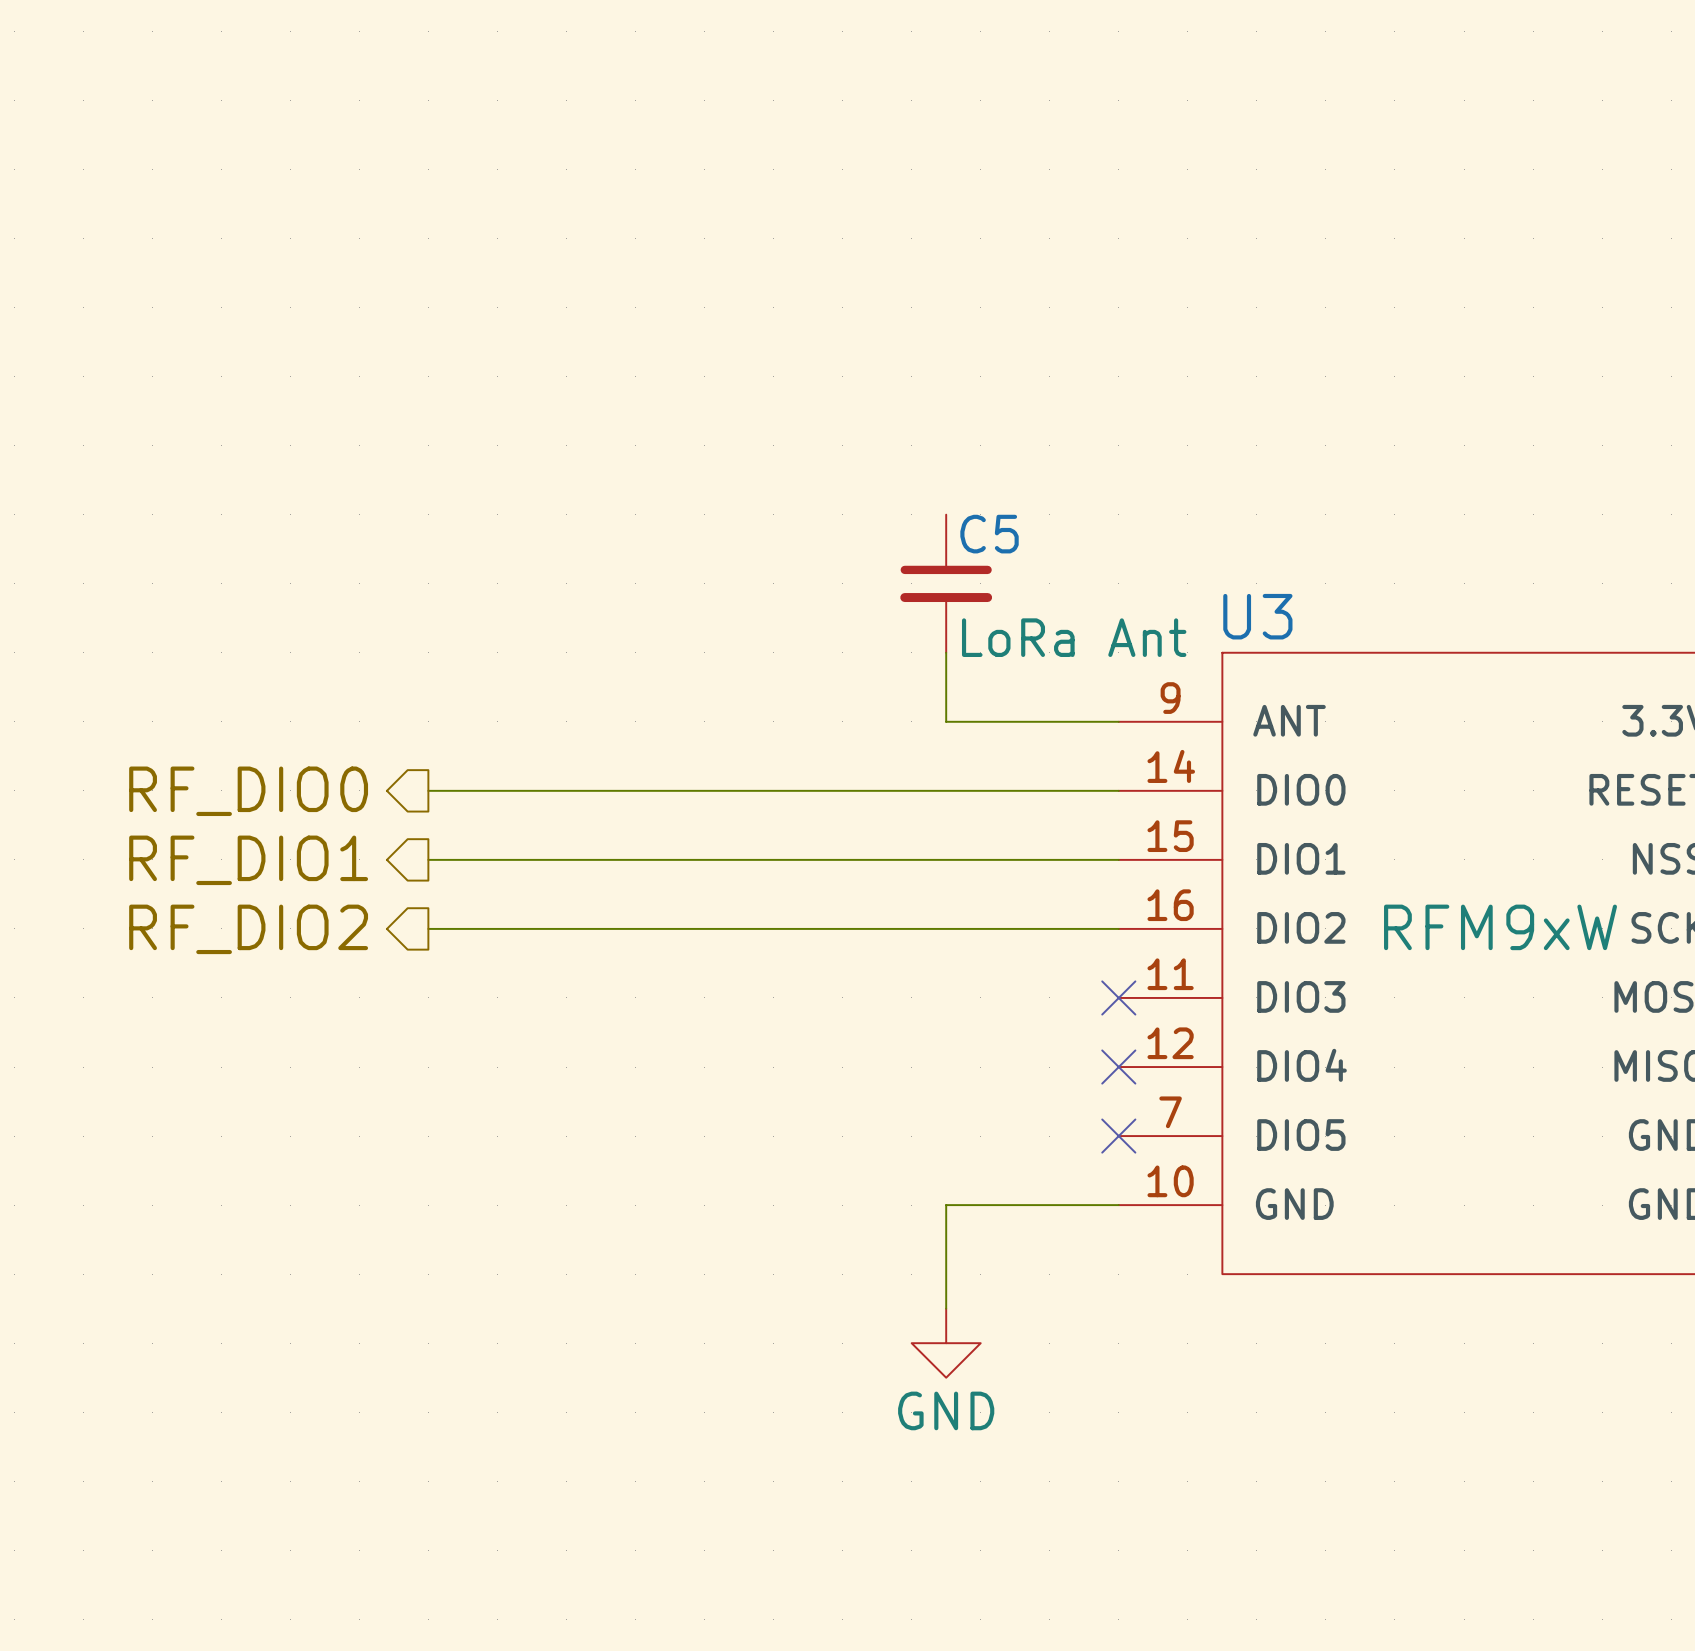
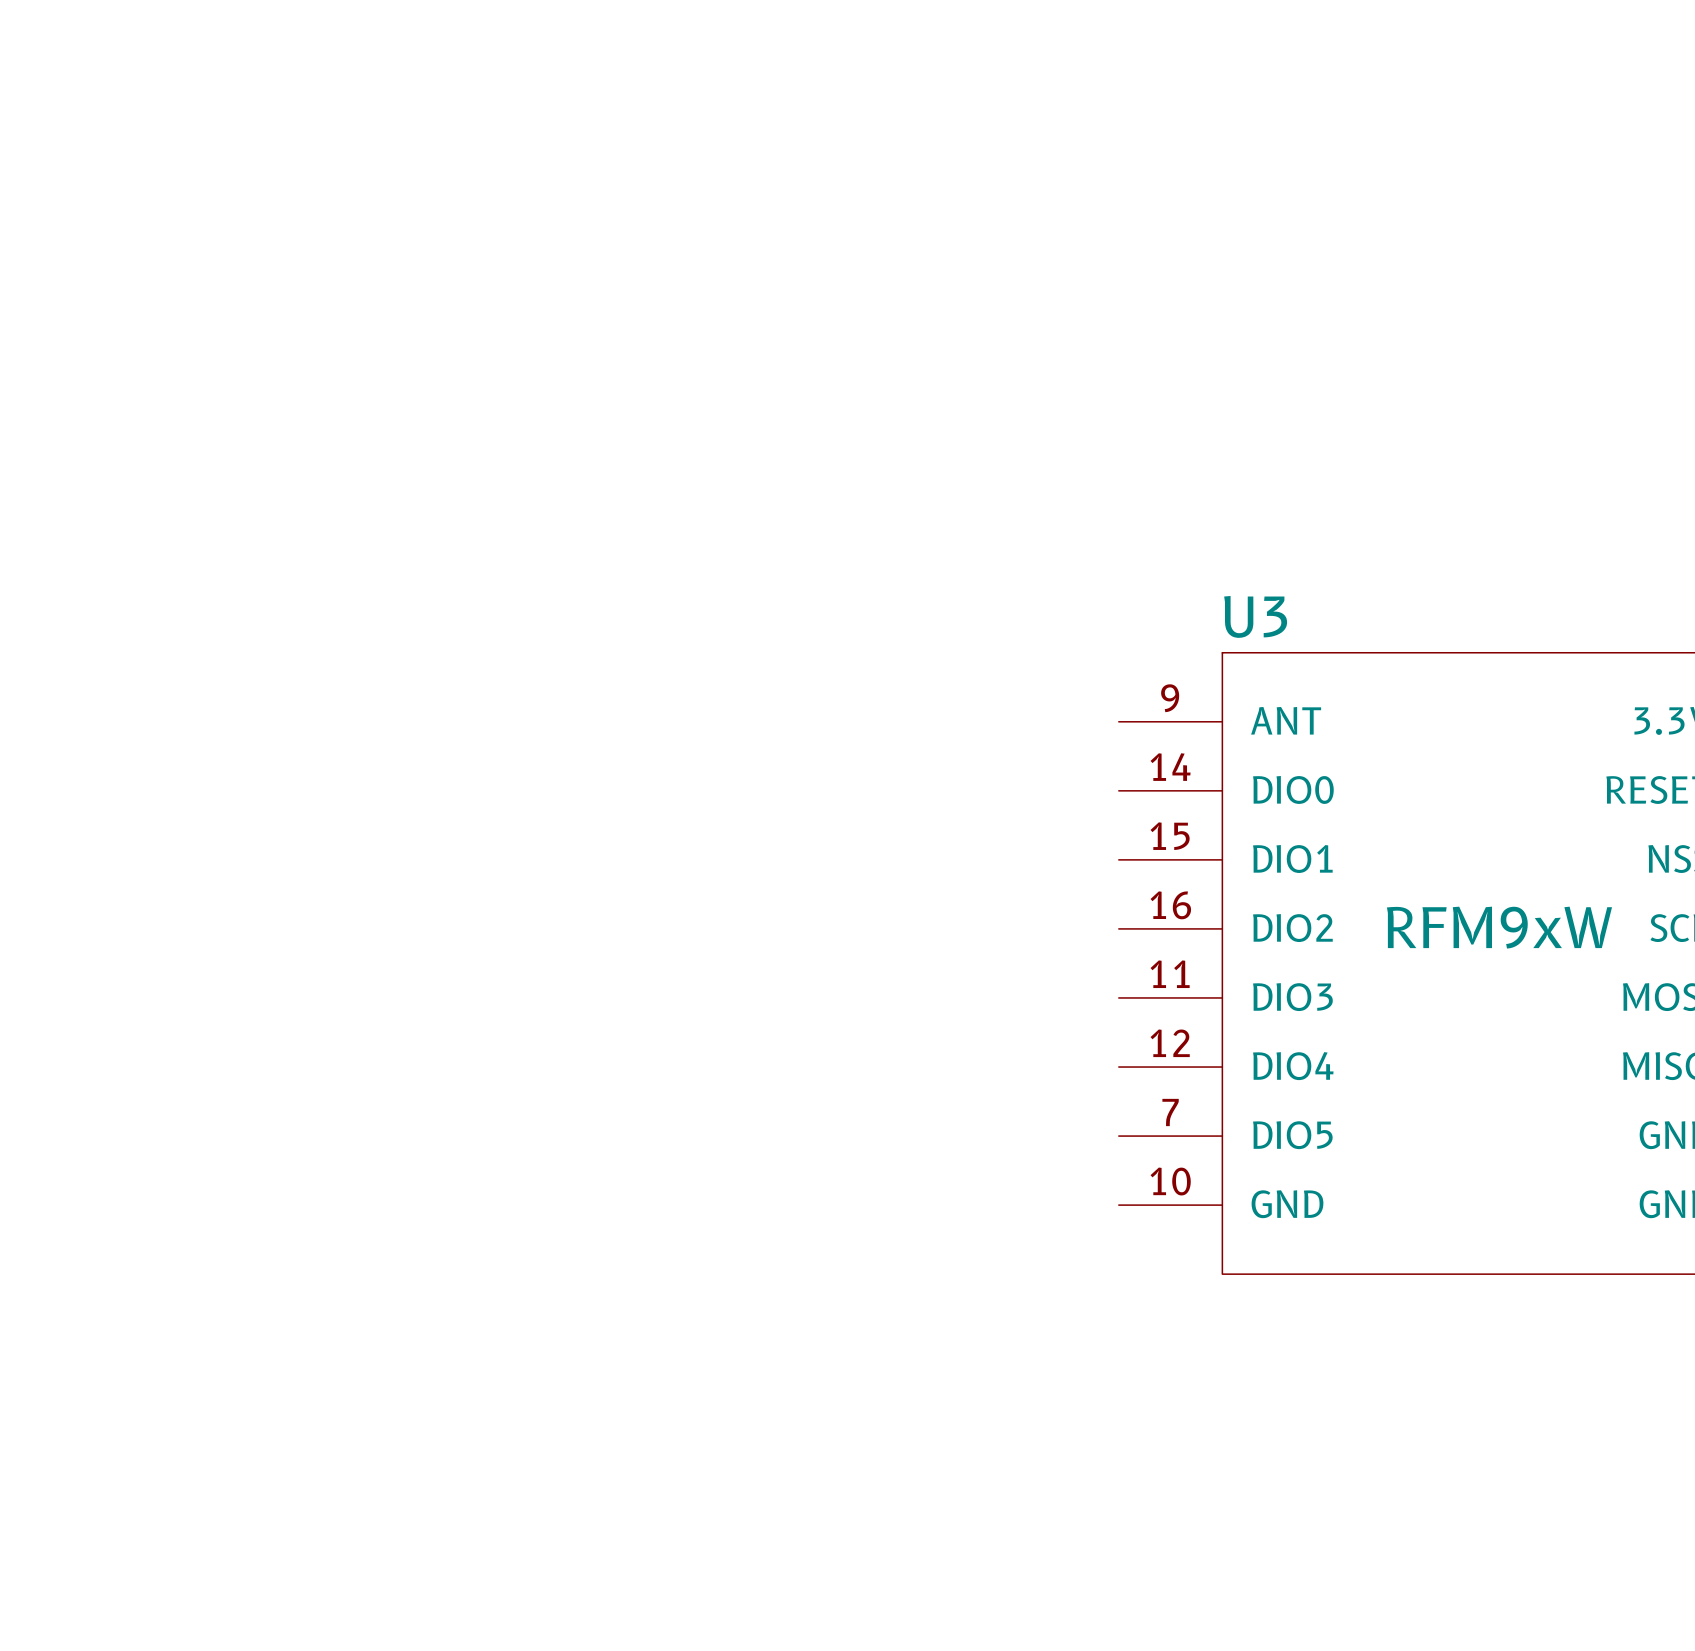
C5: LoRa Ant (946, 583) -> none
wire: (946, 652) (946, 721) (1118, 721) -> none
wire: (428, 790) (1118, 790) -> none
hierarchical label: RF_DIO0 (248, 791) -> none
wire: (428, 859) (1118, 859) -> none
hierarchical label: RF_DIO1 (248, 860) -> none
wire: (428, 928) (1118, 928) -> none
hierarchical label: RF_DIO2 (248, 929) -> none
no-connect mark: (1118, 997) -> none
no-connect mark: (1118, 1067) -> none
no-connect mark: (1118, 1136) -> none
wire: (1118, 1205) (946, 1205) (946, 1308) -> none
power symbol: GND (946, 1343) -> none

